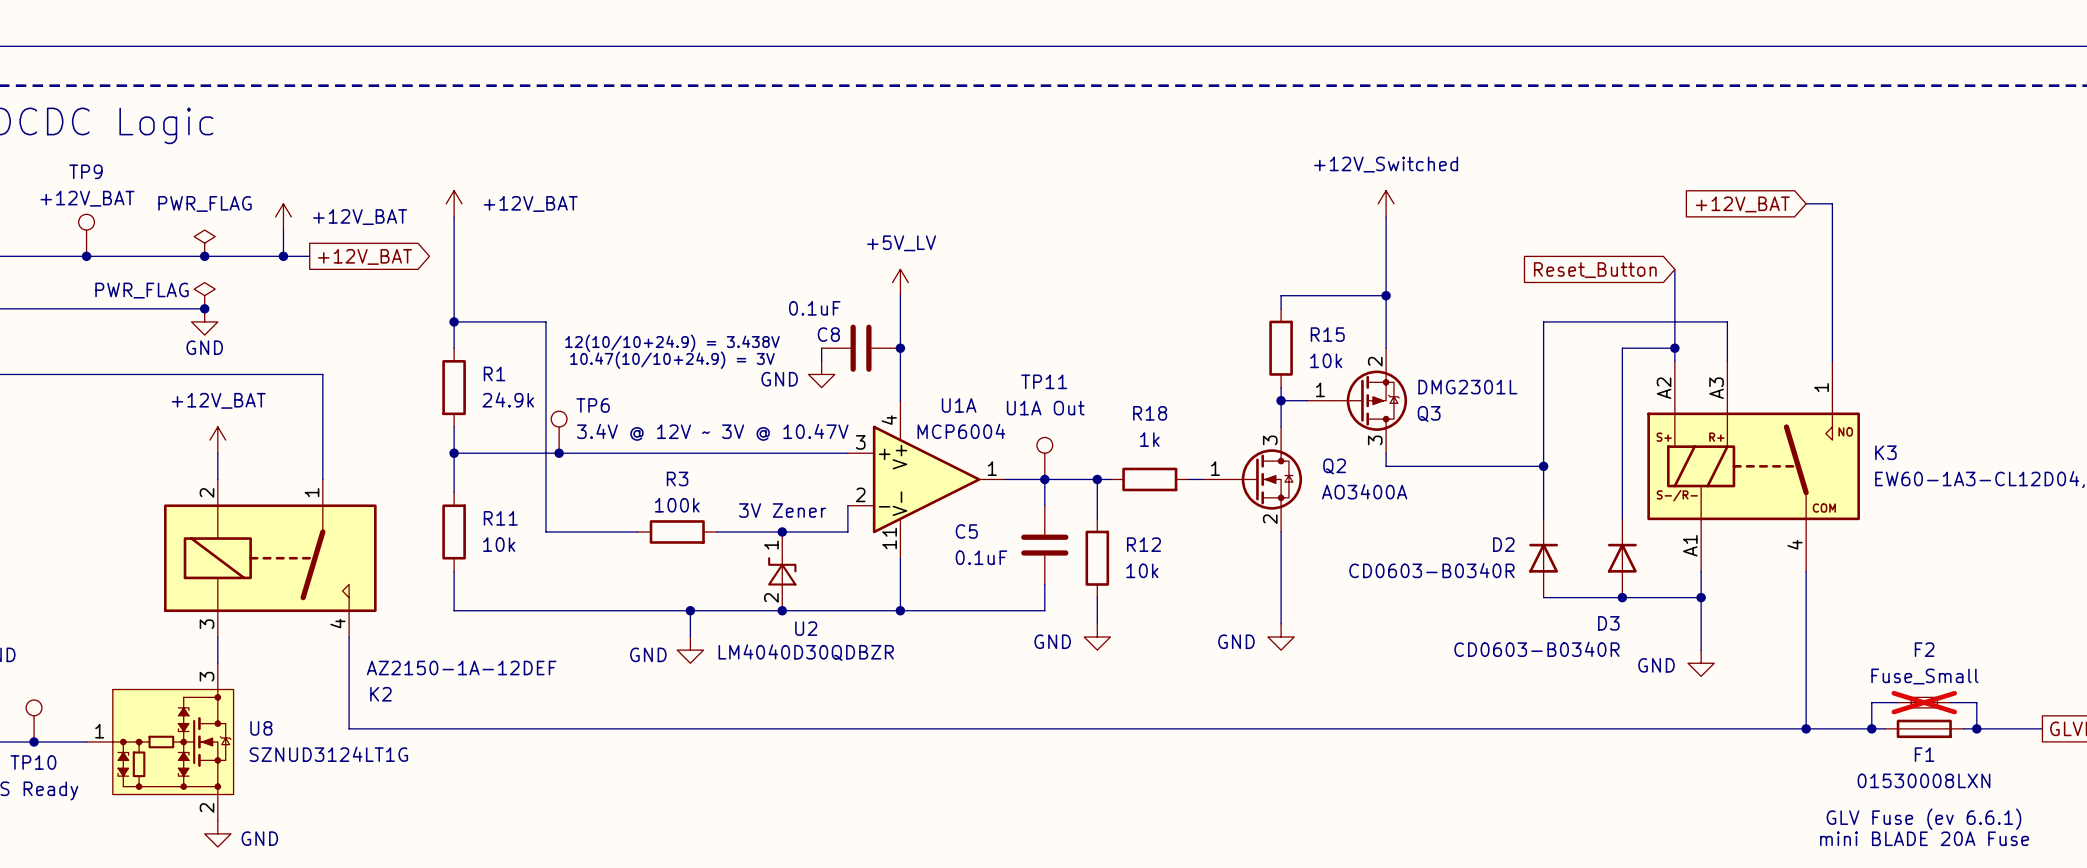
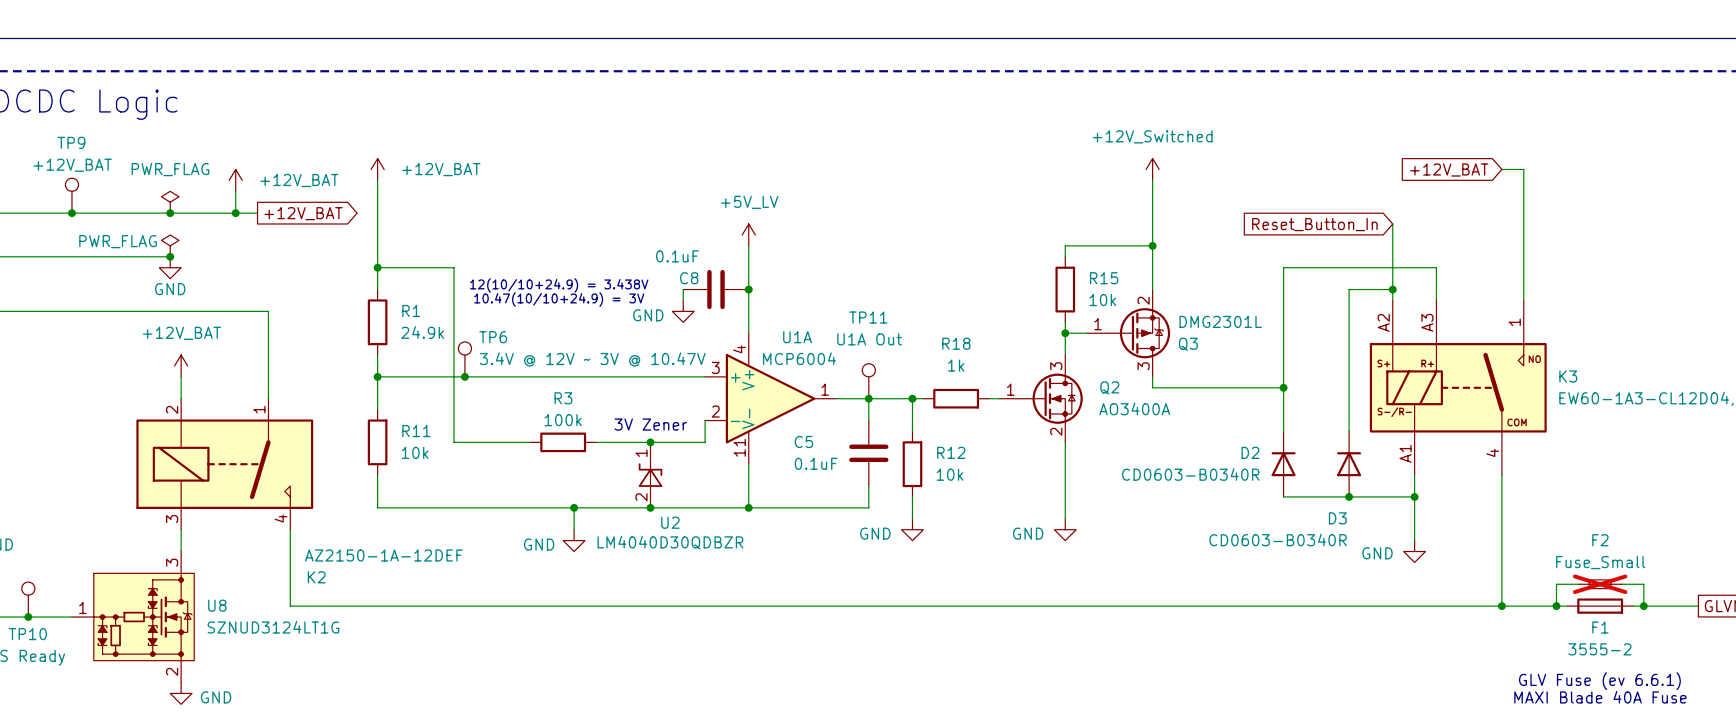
global label: Reset_Button (1595, 270) -> Reset_Button_In (1314, 224)
F1 value: 01530008LXN (1923, 780) -> 3555-2 (1599, 649)
text: mini BLADE 20A Fuse (1924, 838) -> MAXI Blade 40A Fuse (1600, 697)

